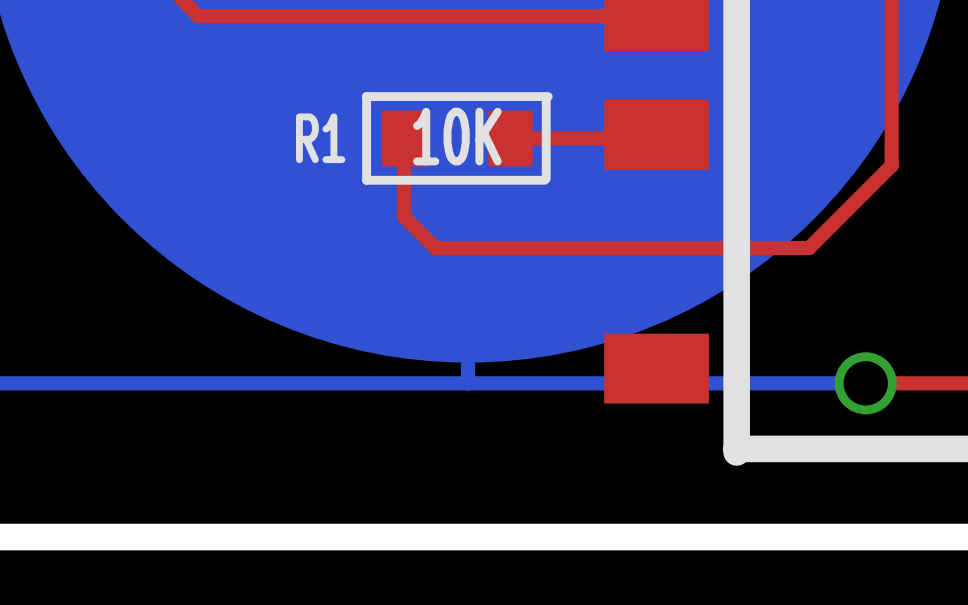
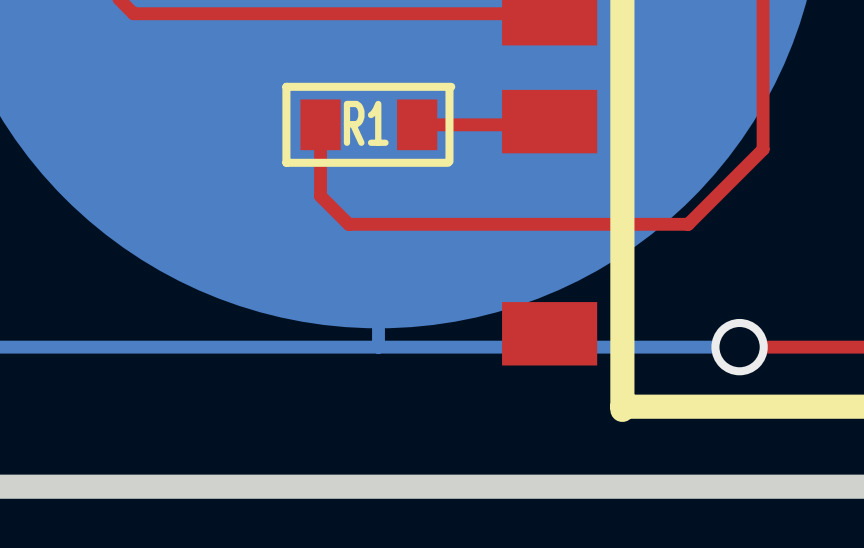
R1 value: 10K (457, 136) -> none
R1 name position: R1 (320, 138) -> R1 (366, 123)

